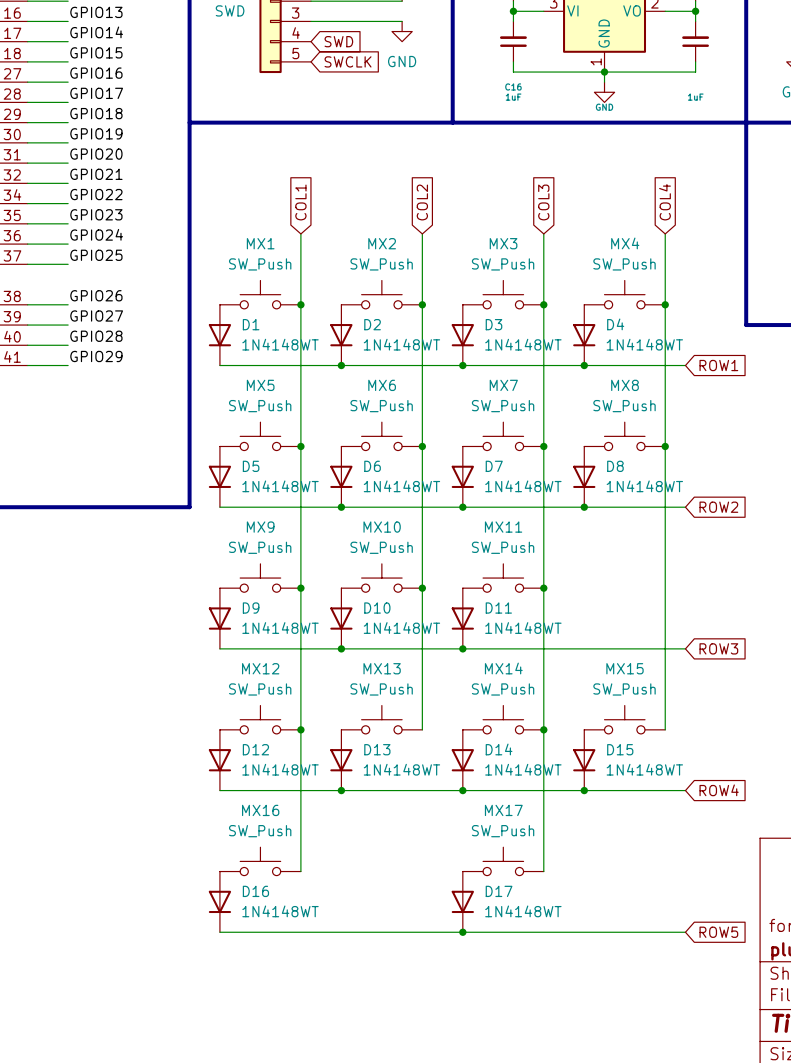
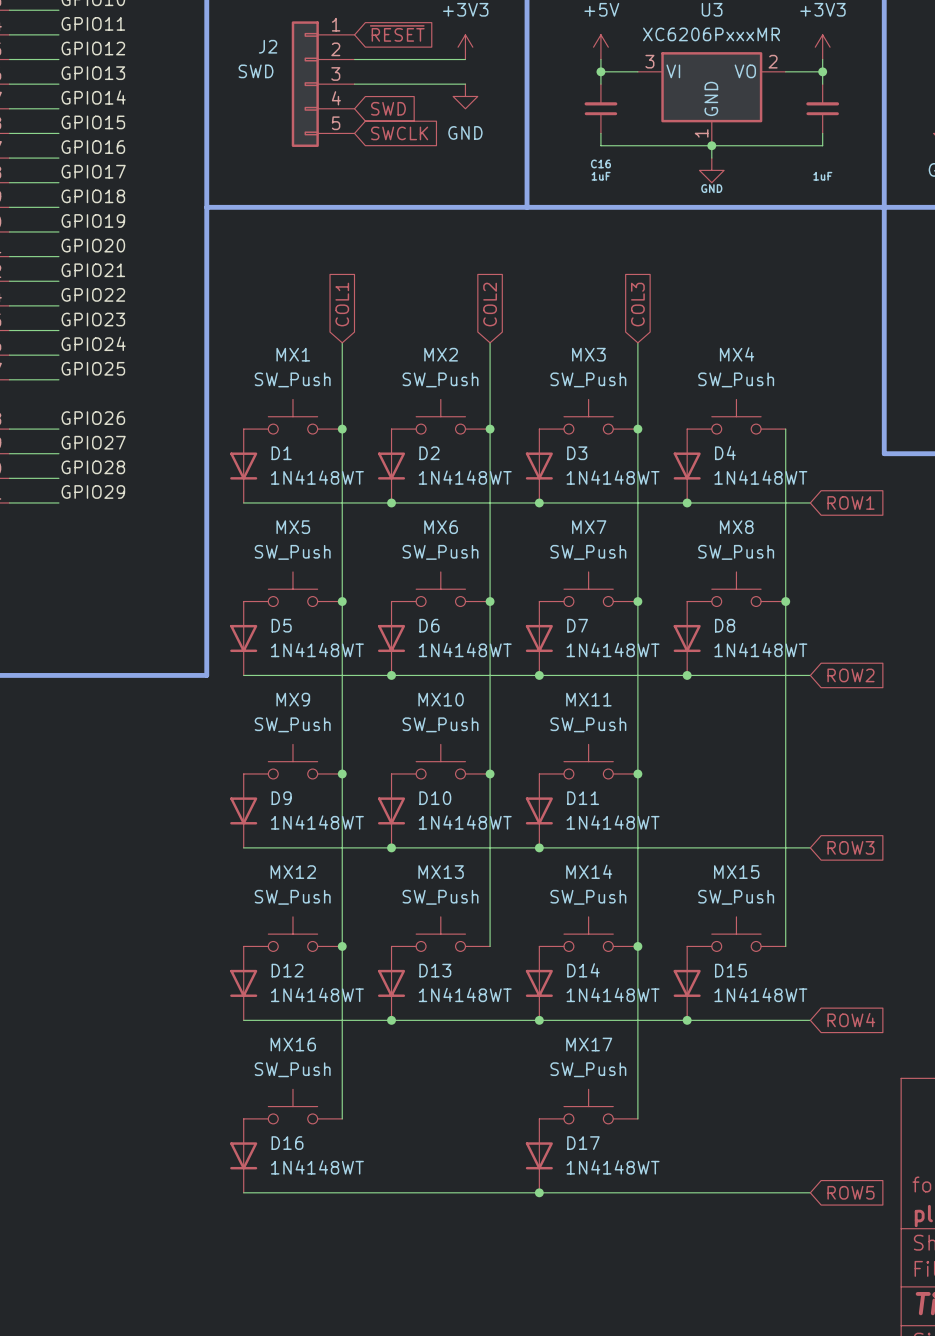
global label: COL4 (665, 202) -> none
wire: (665, 233) (665, 304) -> none
junction: (665, 304) -> none

